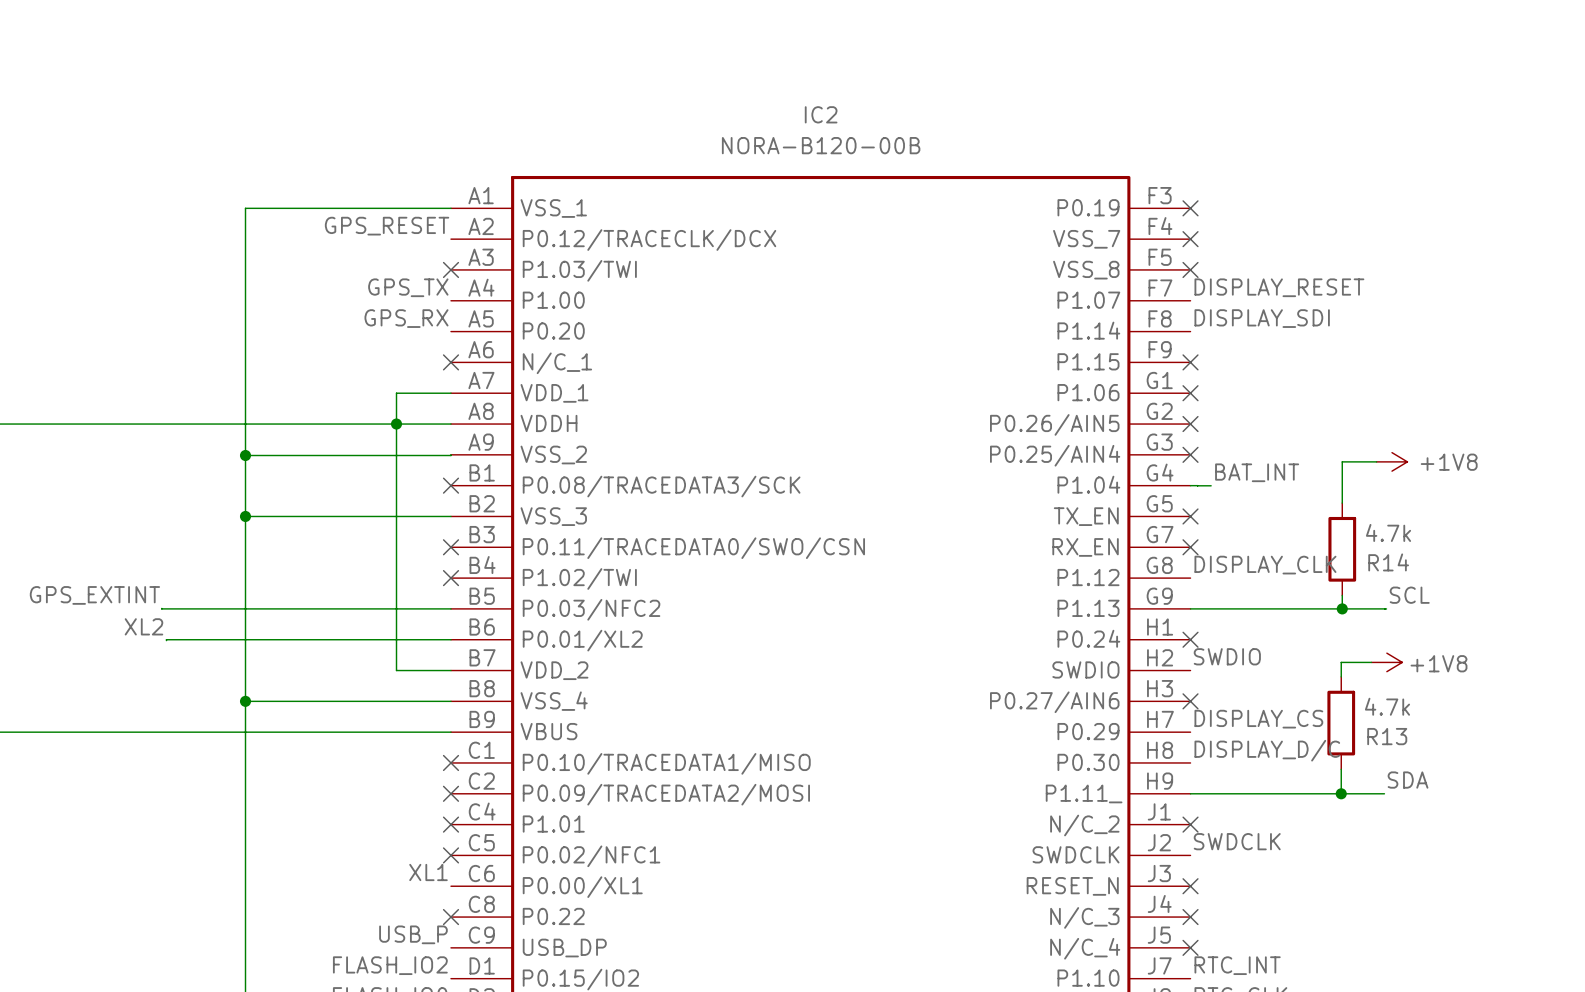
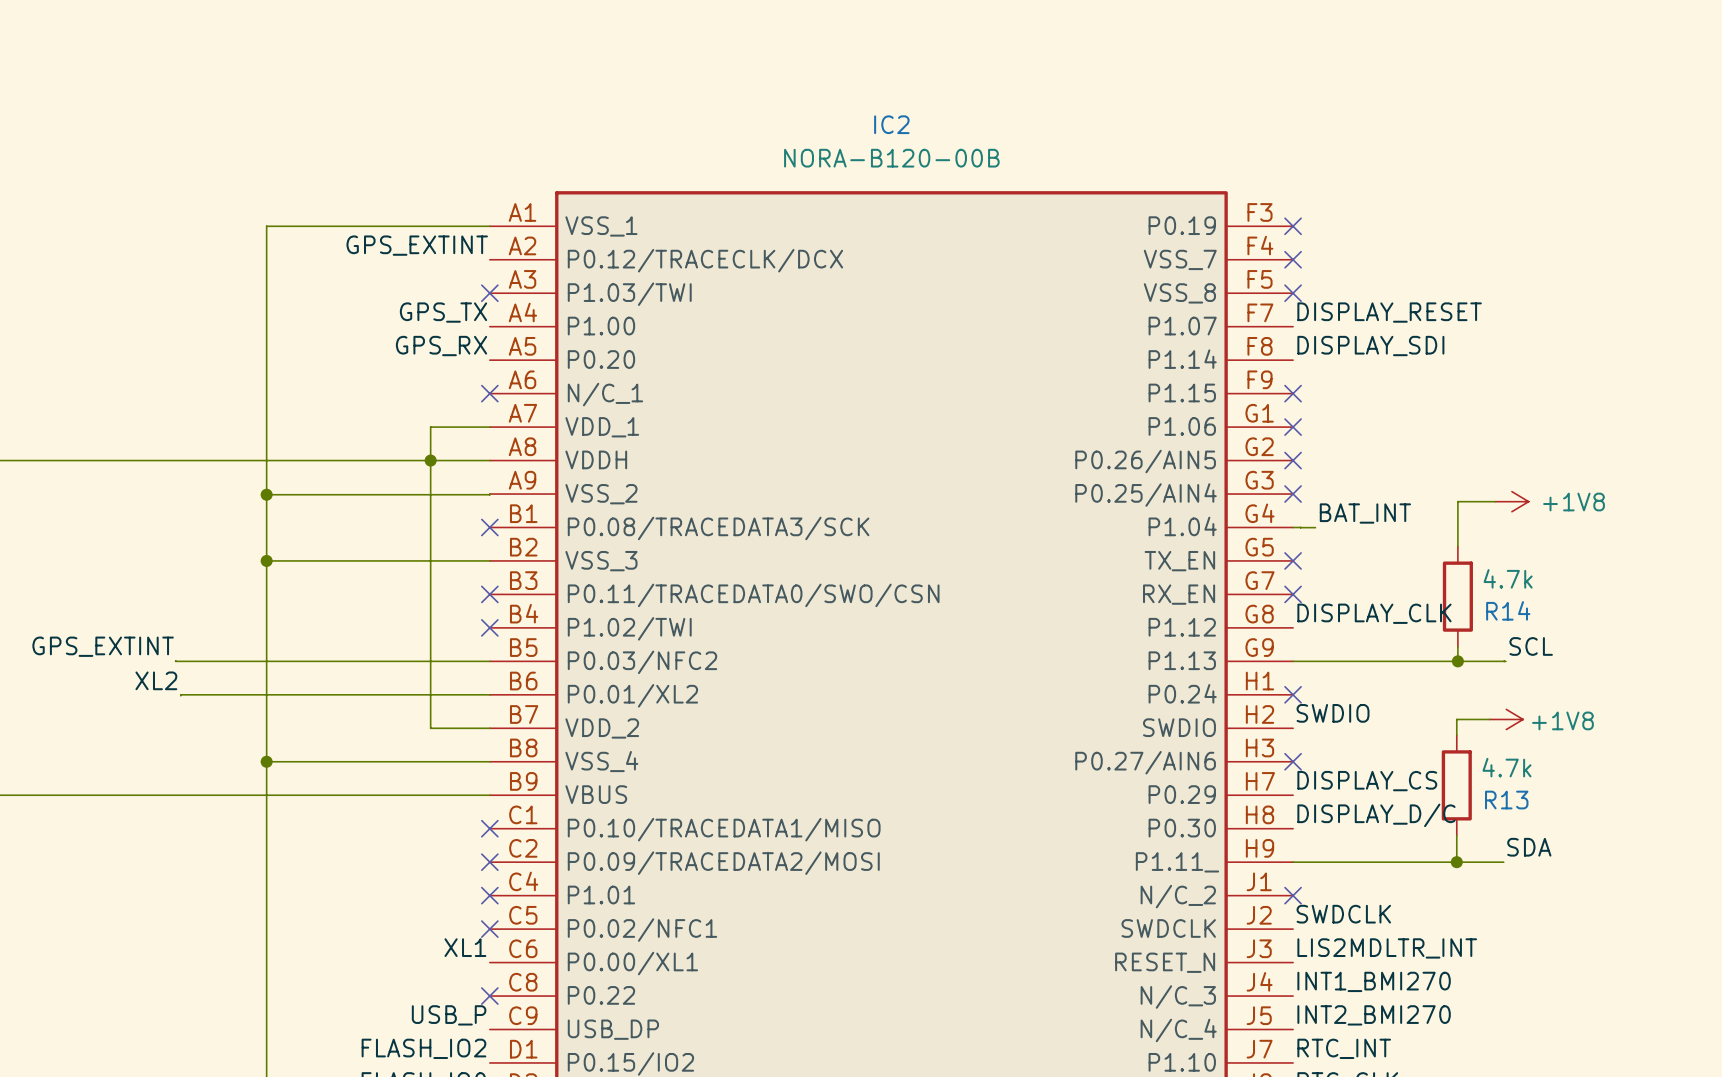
label: GPS_RESET (387, 226) -> GPS_EXTINT (417, 245)
label: none -> LIS2MDLTR_INT (1387, 948)
no-connect mark: (1190, 886) -> none
label: none -> INT1_BMI270 (1374, 981)
no-connect mark: (1190, 917) -> none
label: none -> INT2_BMI270 (1374, 1015)
no-connect mark: (1190, 947) -> none

